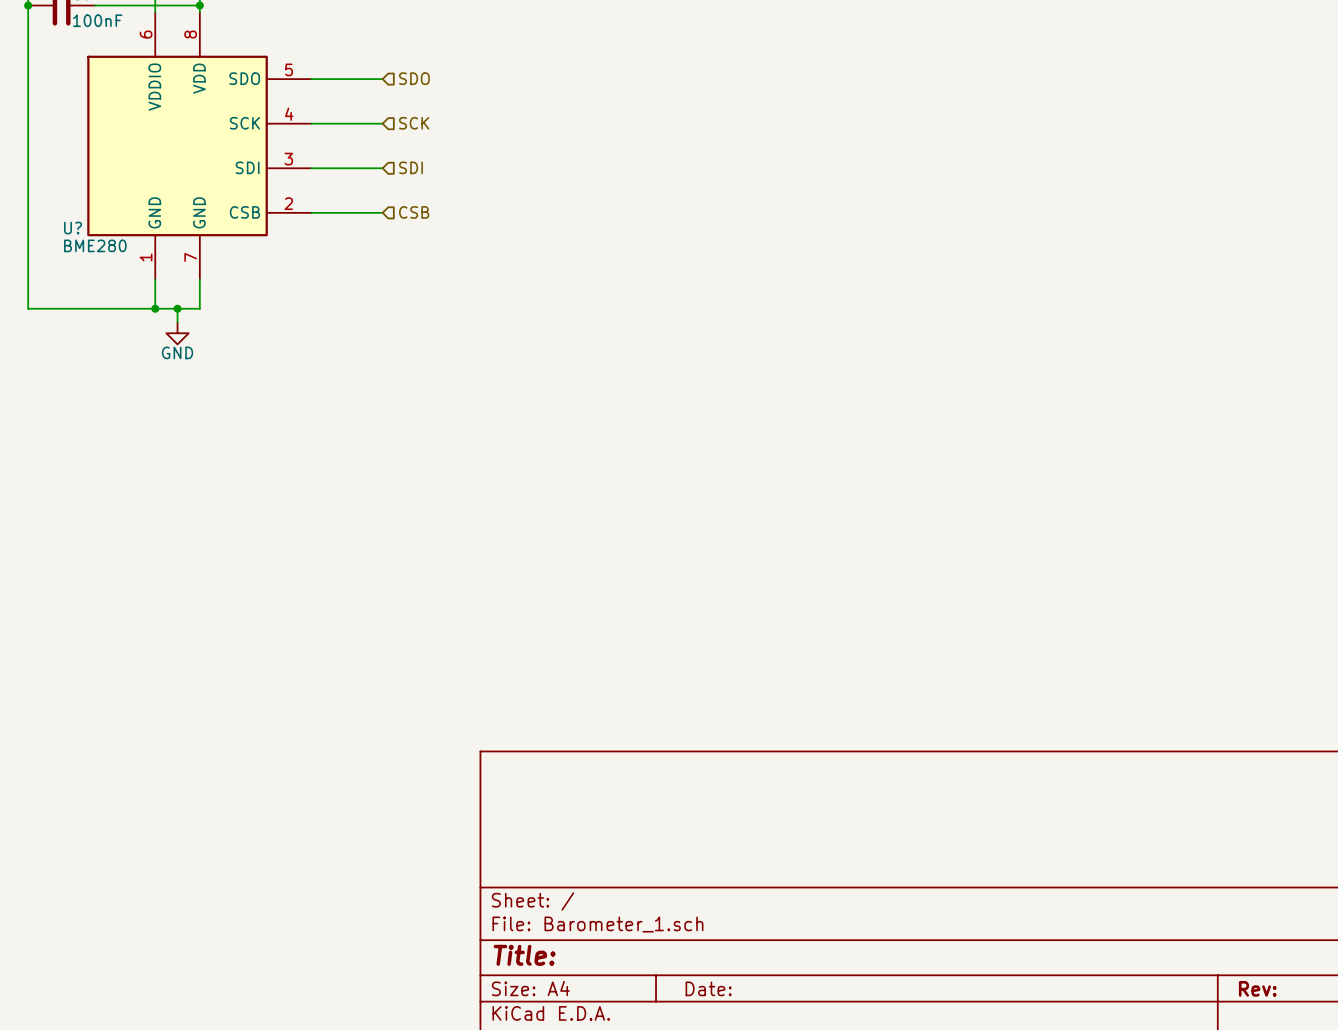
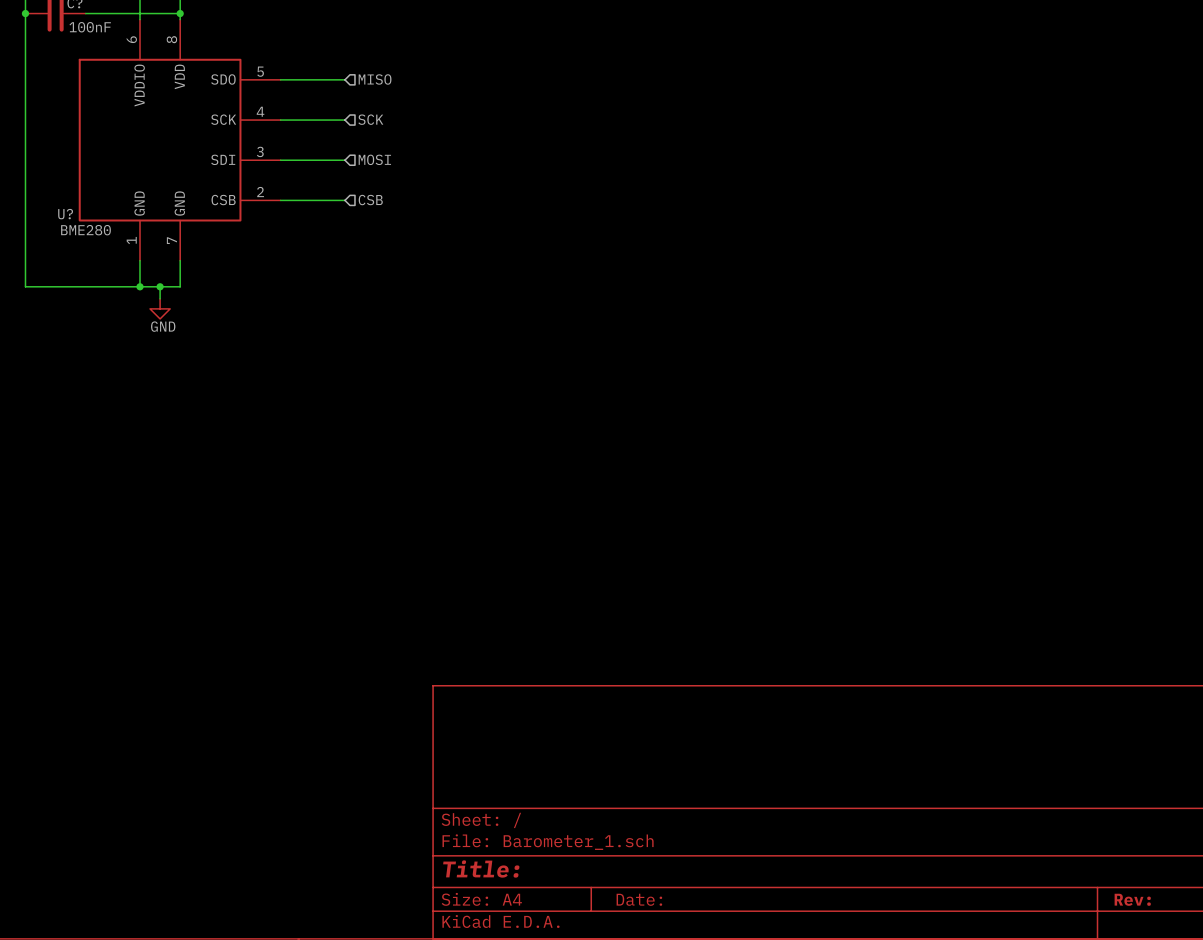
hierarchical label: SDO (414, 78) -> MISO (375, 79)
hierarchical label: SDI (410, 167) -> MOSI (374, 159)

